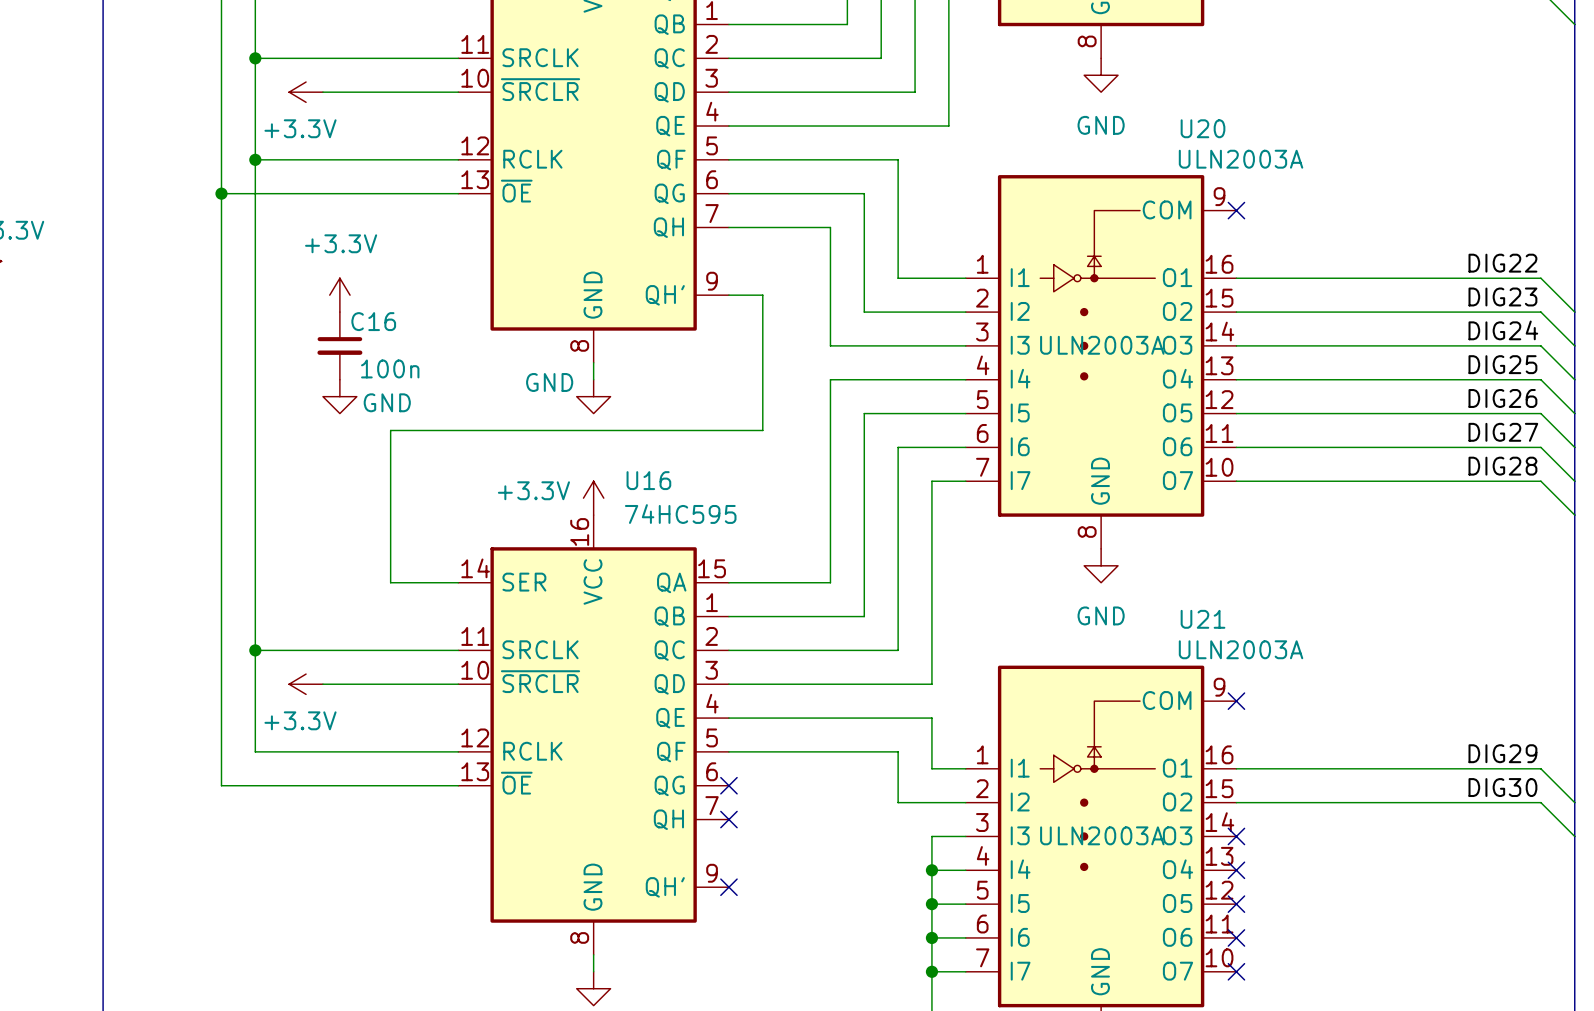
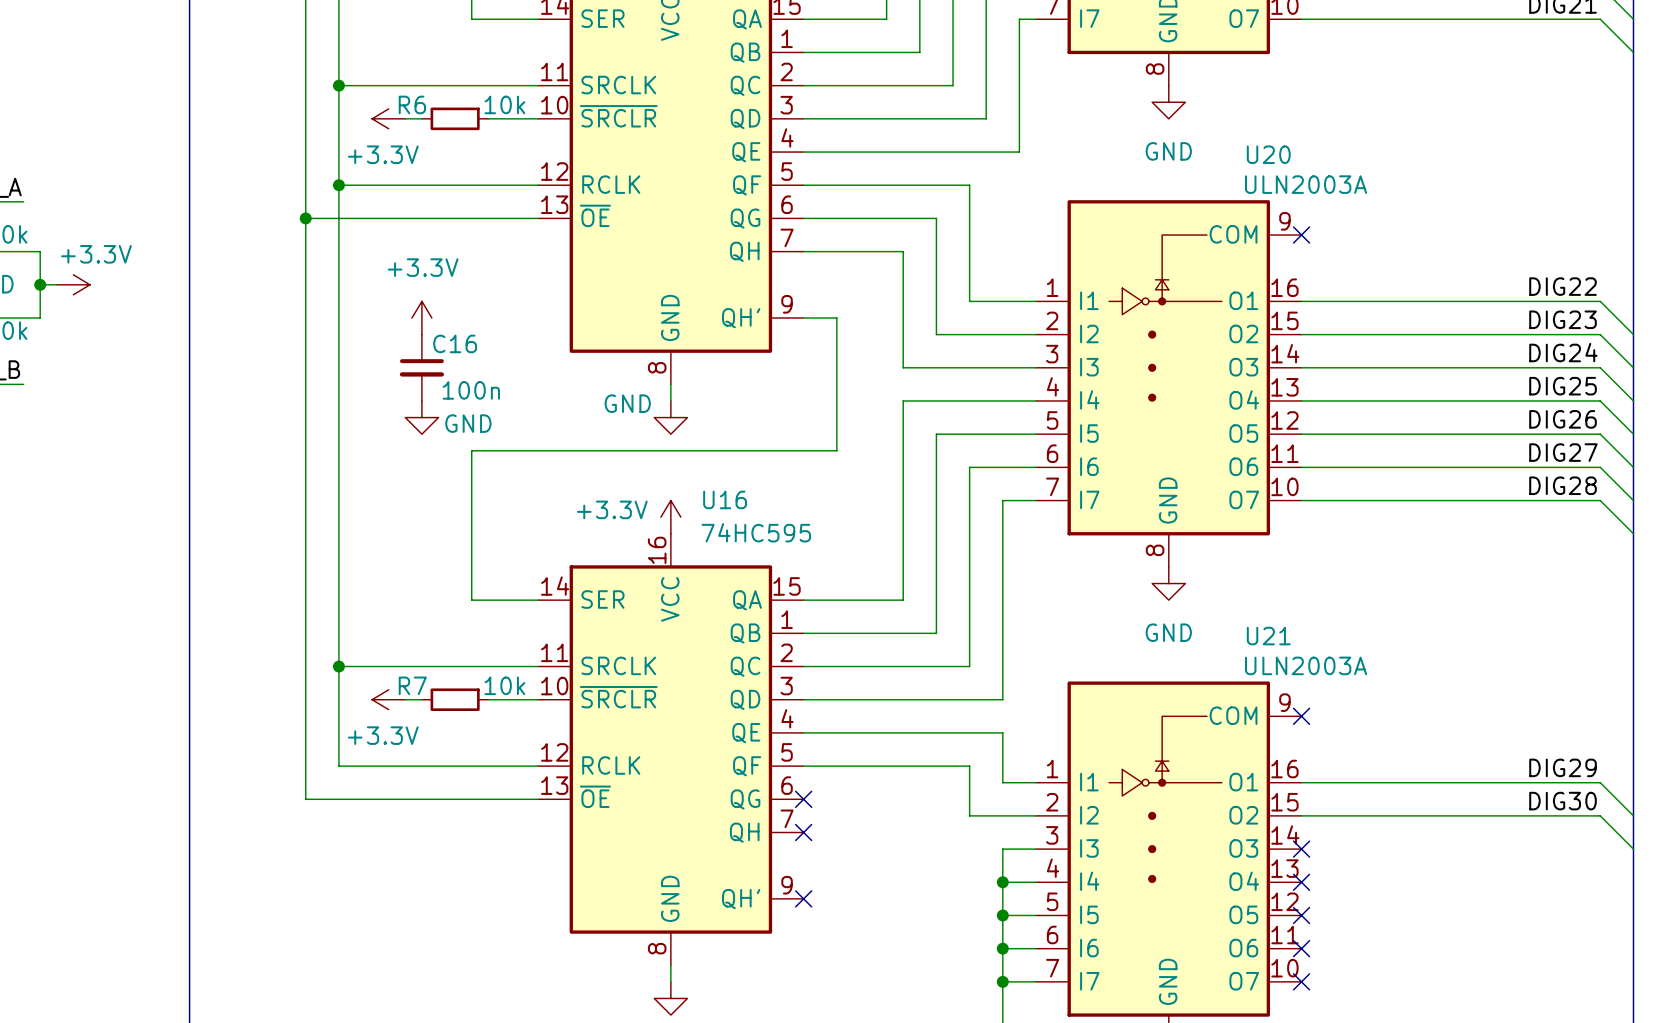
wire: (339, 92) (407, 92) -> none
R6: none -> 10k (455, 118)
U20 text: ULN2003A (1102, 345) -> none
wire: (339, 684) (407, 684) -> none
R7: none -> 10k (455, 699)
U21 text: ULN2003A (1102, 835) -> none

